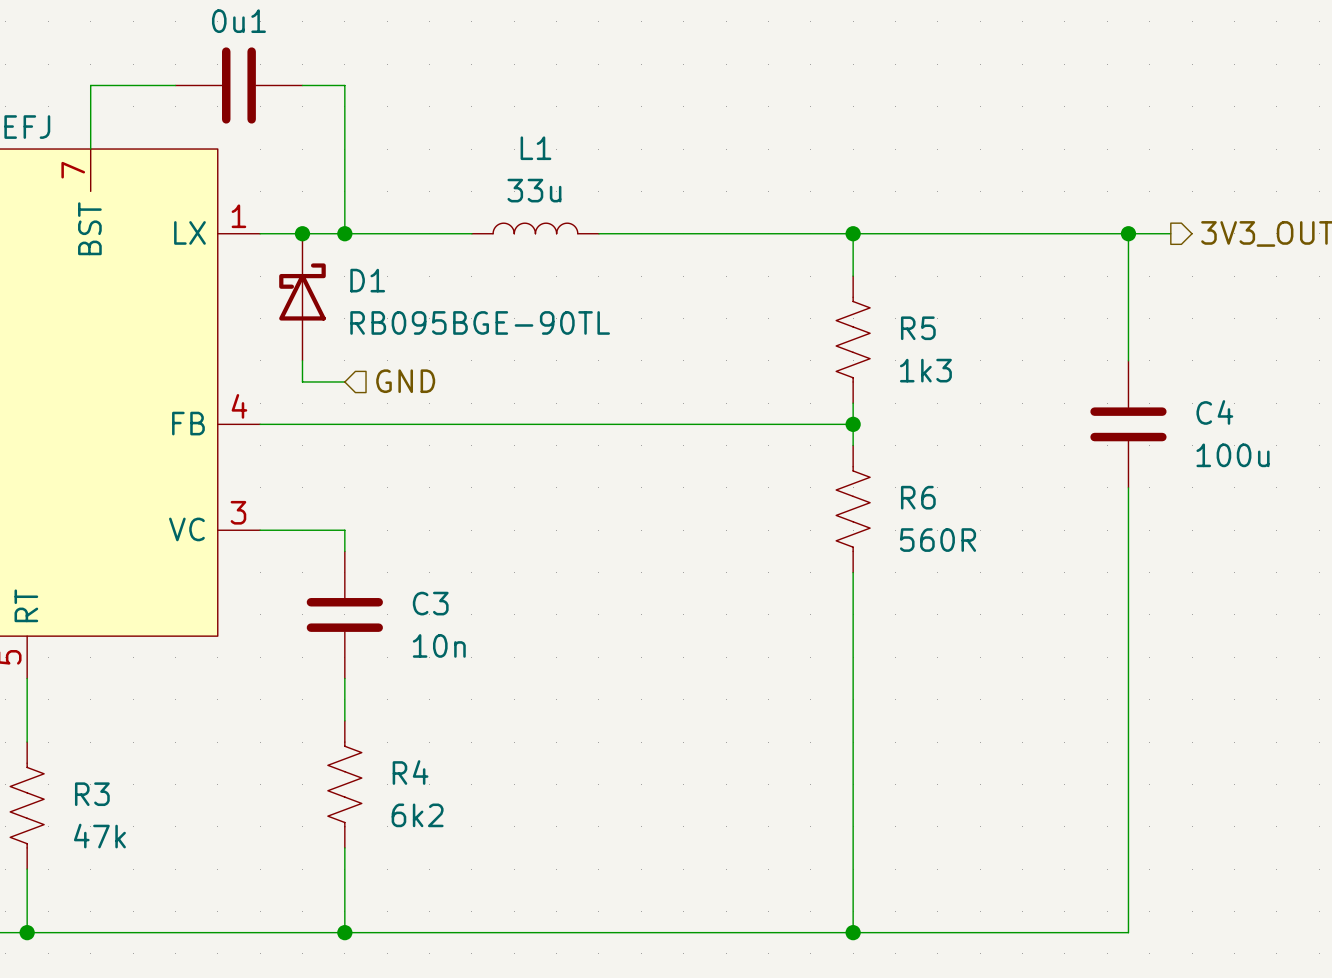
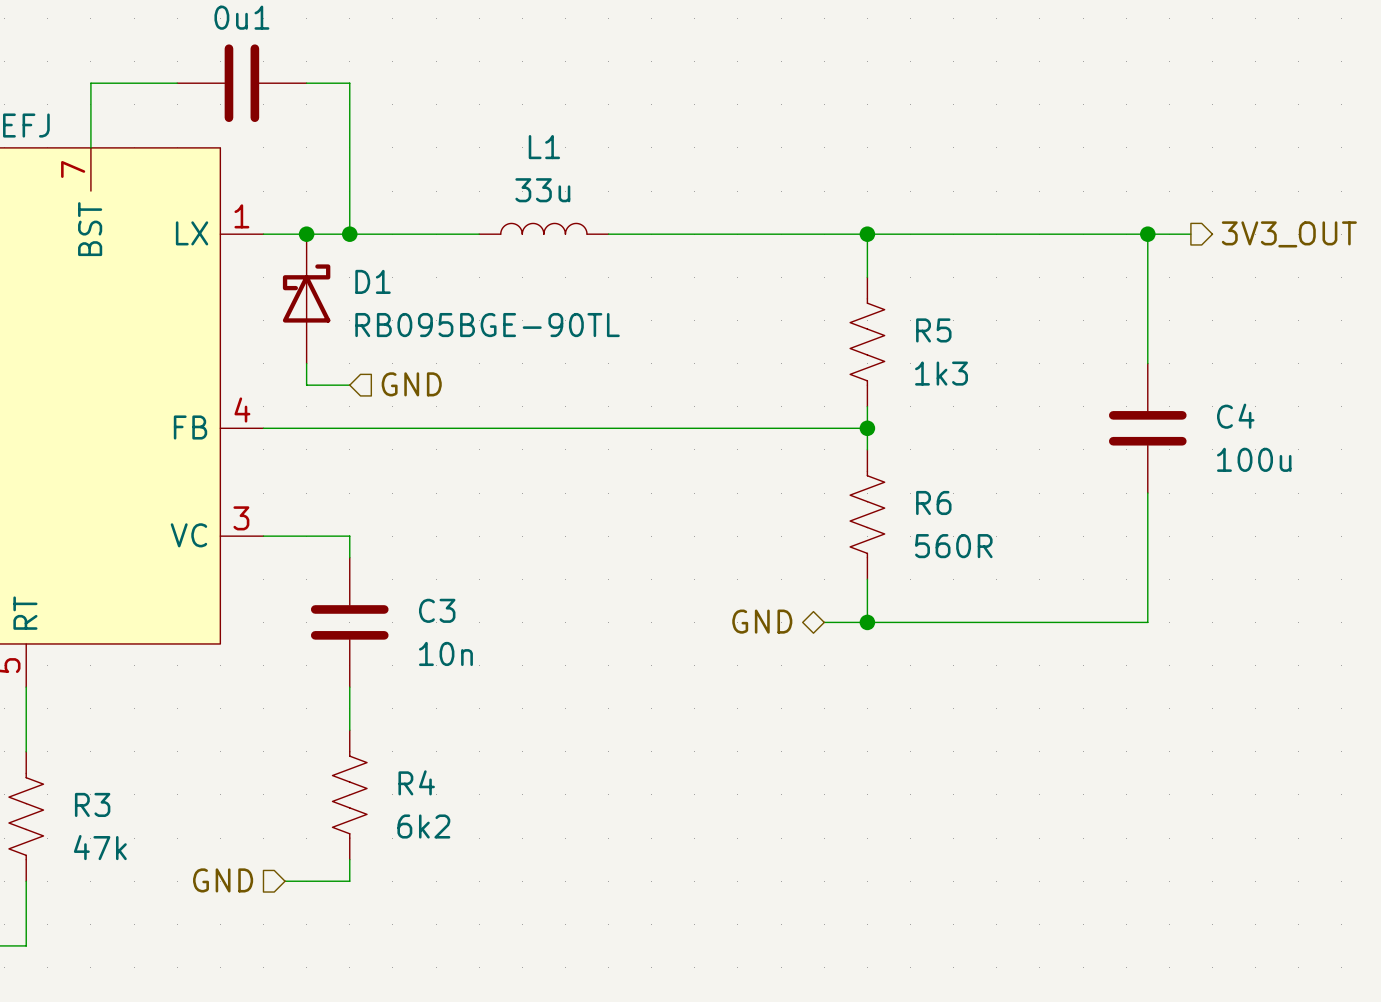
hierarchical label: none -> GND (762, 621)
wire: (853, 614) (853, 932) -> none
junction: none -> (867, 622)
wire: (1128, 614) (1128, 932) (27, 932) -> (1147, 622) (824, 622)
hierarchical label: none -> GND (223, 880)
wire: (344, 869) (344, 932) -> (349, 881) (285, 881)
junction: (27, 932) -> none
junction: (344, 932) -> none
junction: (853, 932) -> none

